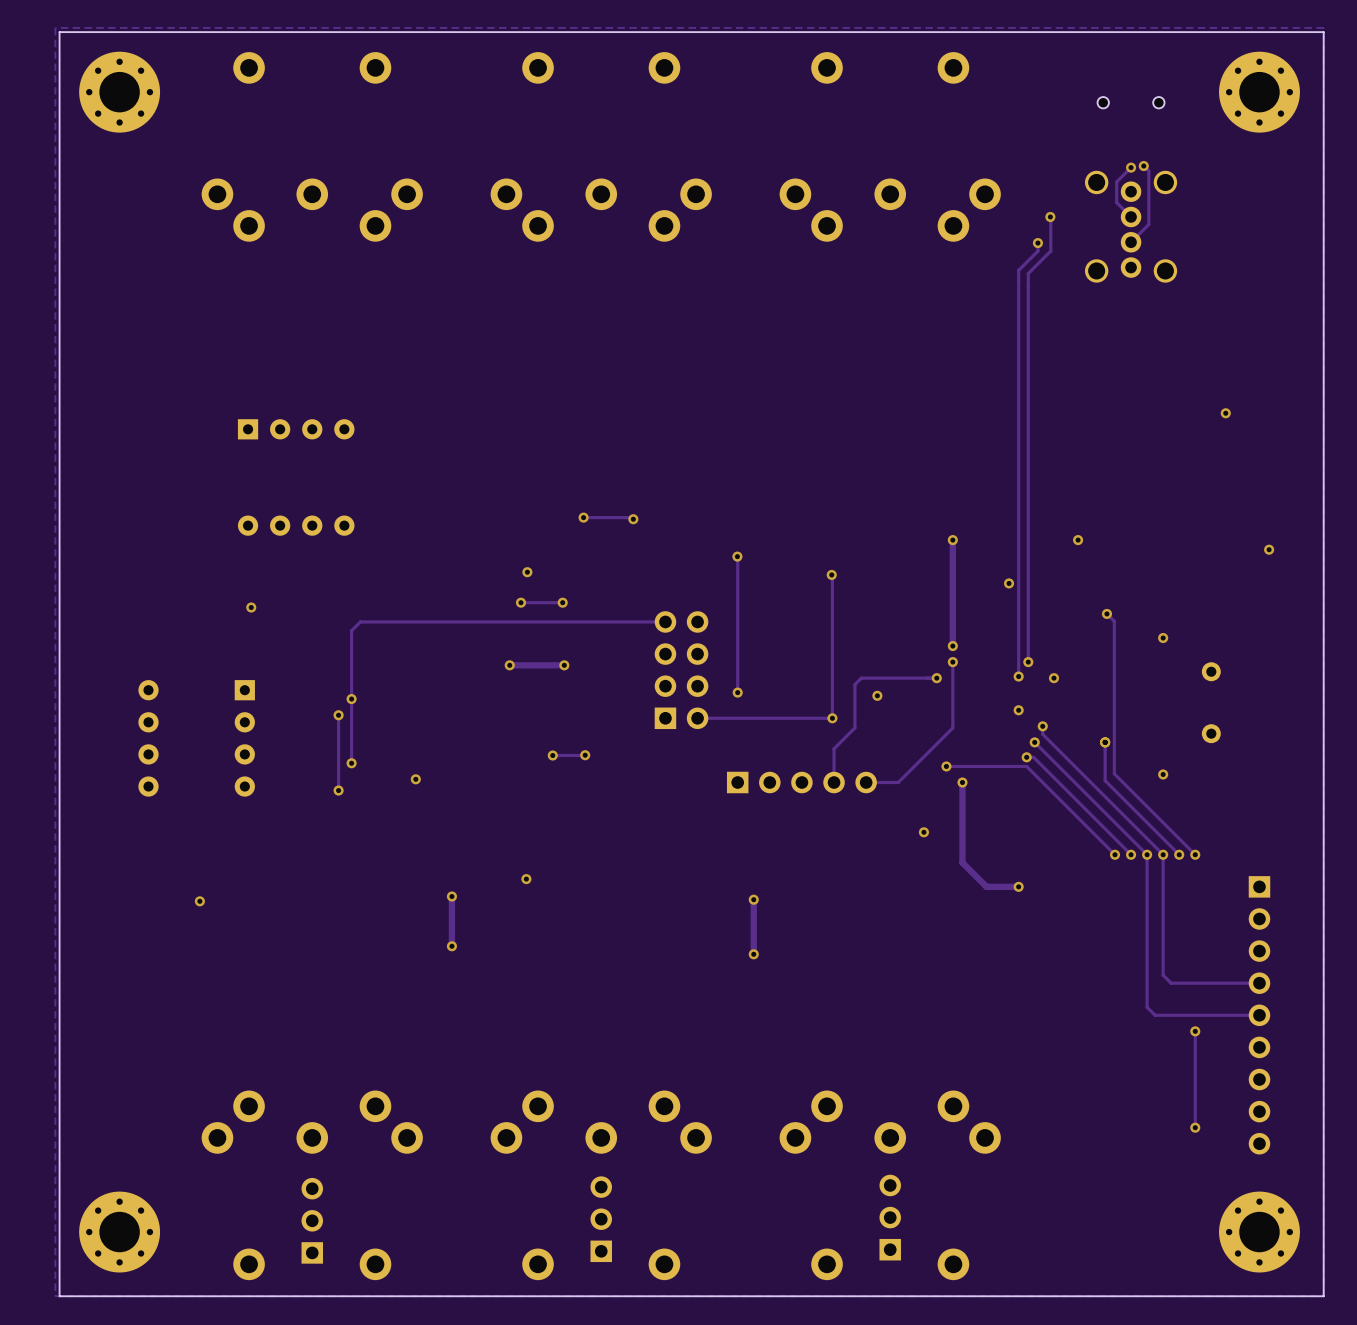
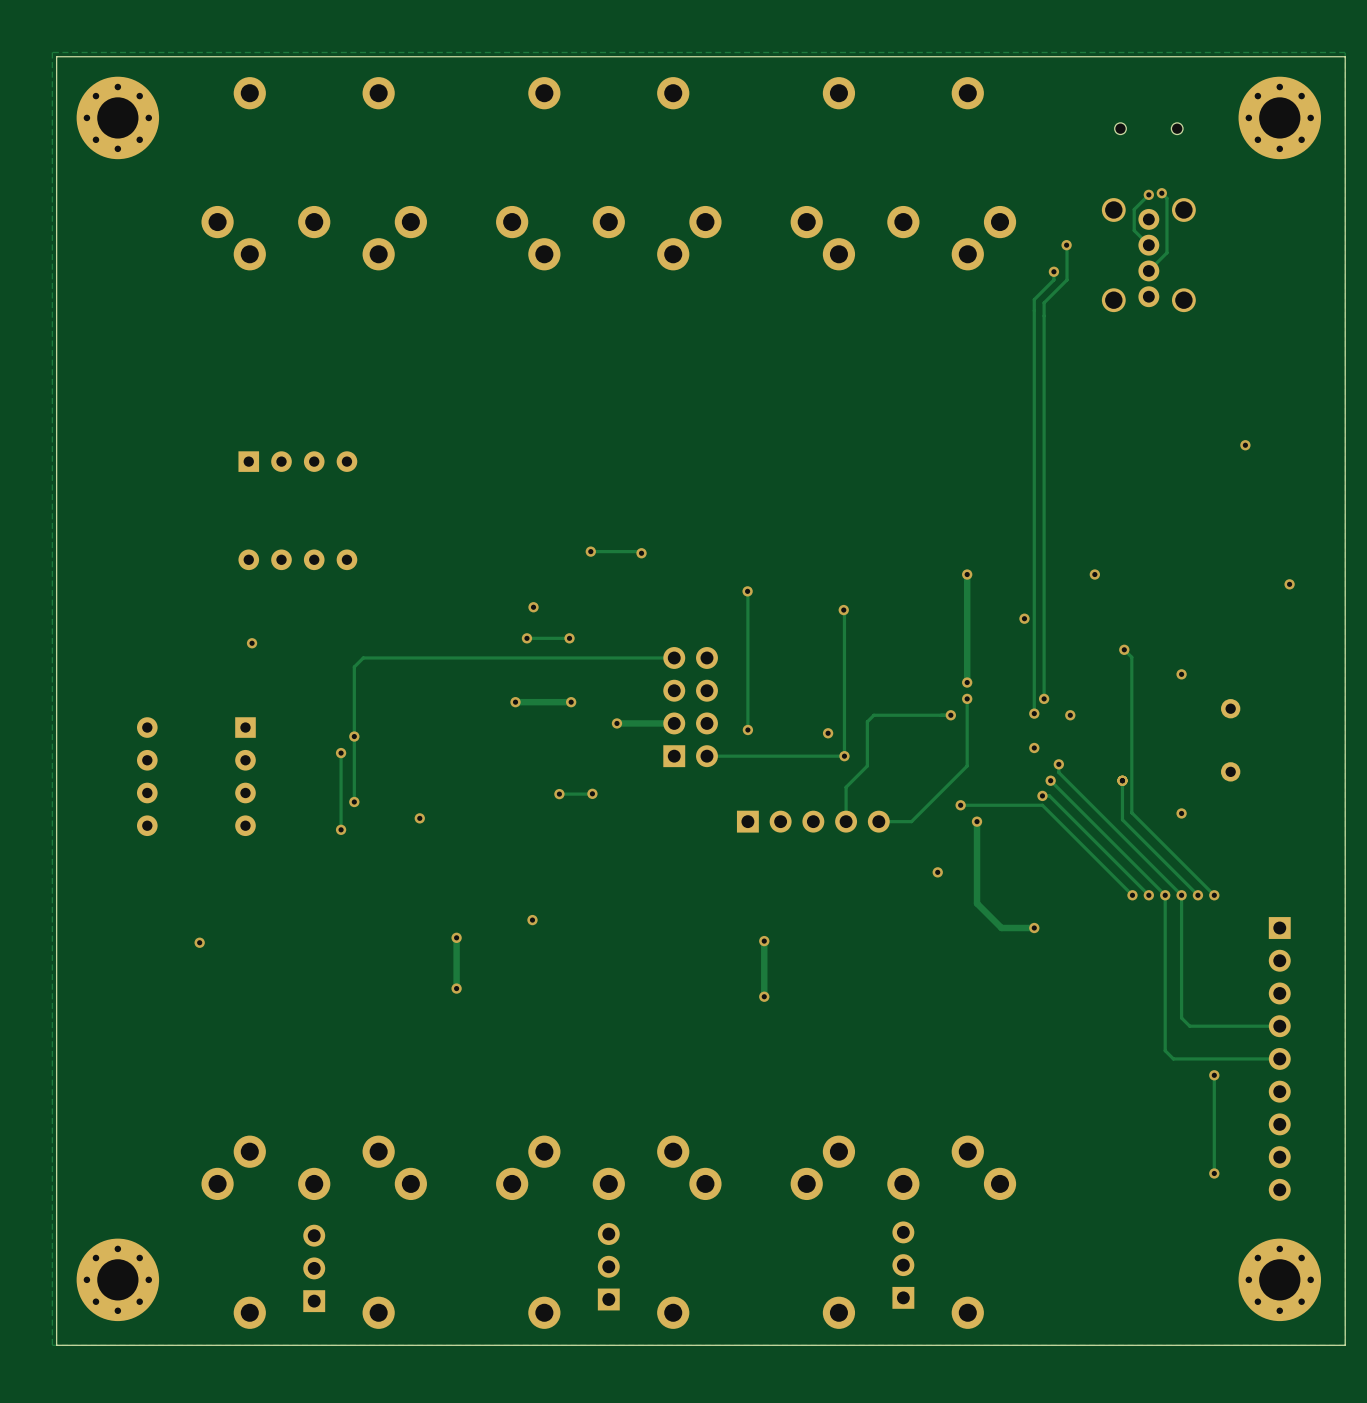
via: none -> (616, 723)
track: none -> (674, 723) (616, 723)
via position: (877, 695) -> (828, 733)

